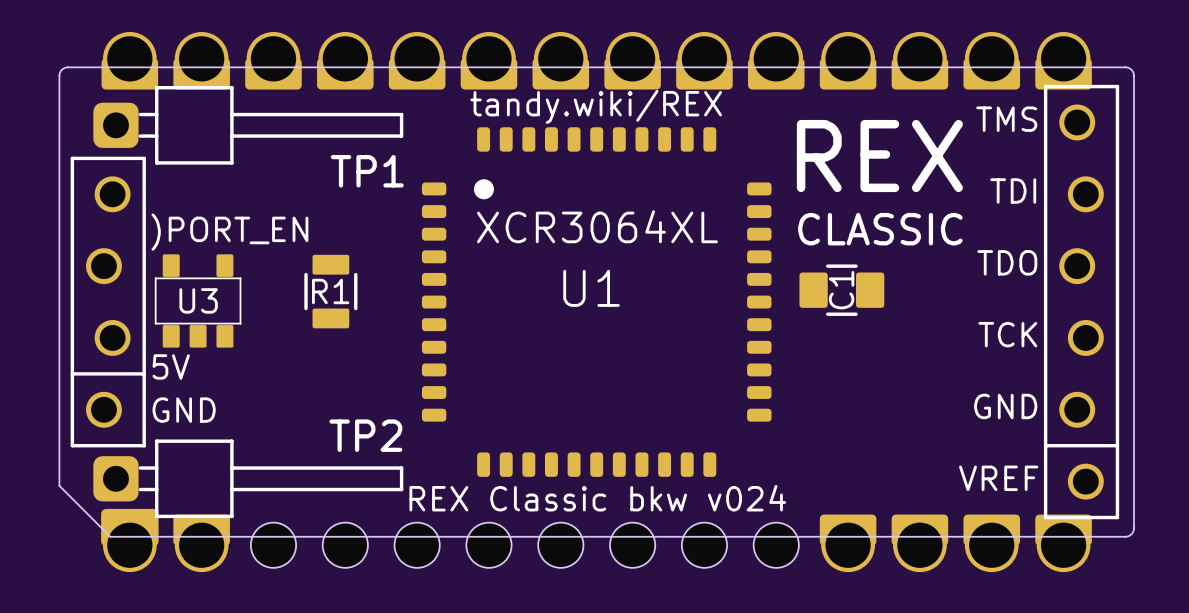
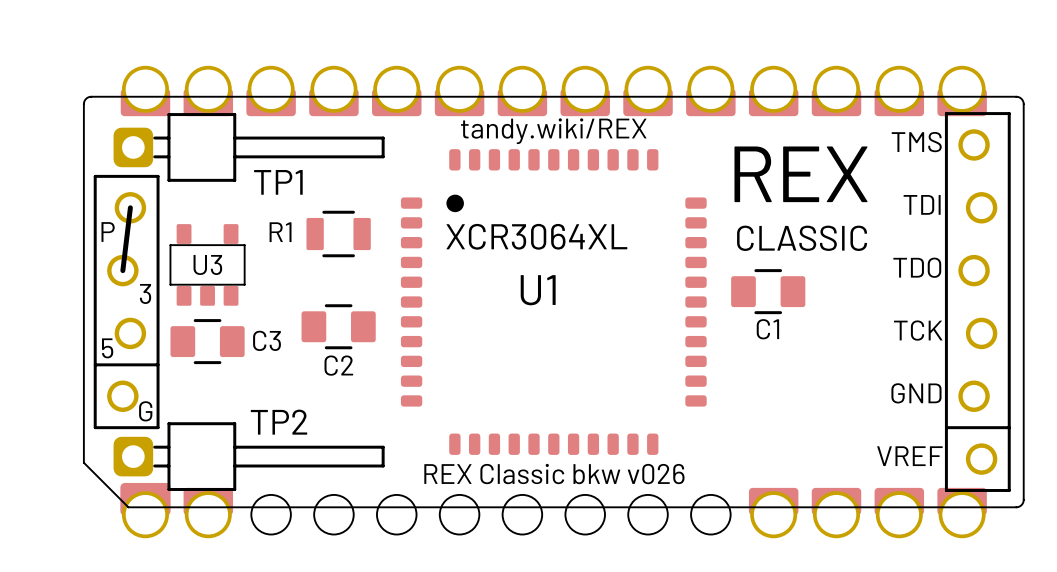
TP1 name position: TP1 (367, 171) -> TP1 (278, 182)
line: none -> (130, 207) (122, 270)
text: none -> P (108, 232)
text: )PORT_EN (229, 232) -> none
C1 name rotation: 0° (841, 290) -> 90° clockwise (767, 329)
R1 rotation: 0° (330, 291) -> 90° clockwise (338, 234)
R1 position: (330, 291) -> (338, 234)
R1 name position: R1 (330, 291) -> R1 (280, 232)
text: none -> 3 (145, 293)
U3 position: (198, 300) -> (207, 264)
C2: none -> (338, 326)
C3: none -> (207, 341)
text: none -> 5 (107, 348)
text: 5V (171, 366) -> none
text: GND (184, 410) -> G (145, 411)
TP2 name position: TP2 (365, 435) -> TP2 (279, 422)
text: REX Classic bkw v024 (597, 498) -> REX Classic bkw v026 (554, 474)

